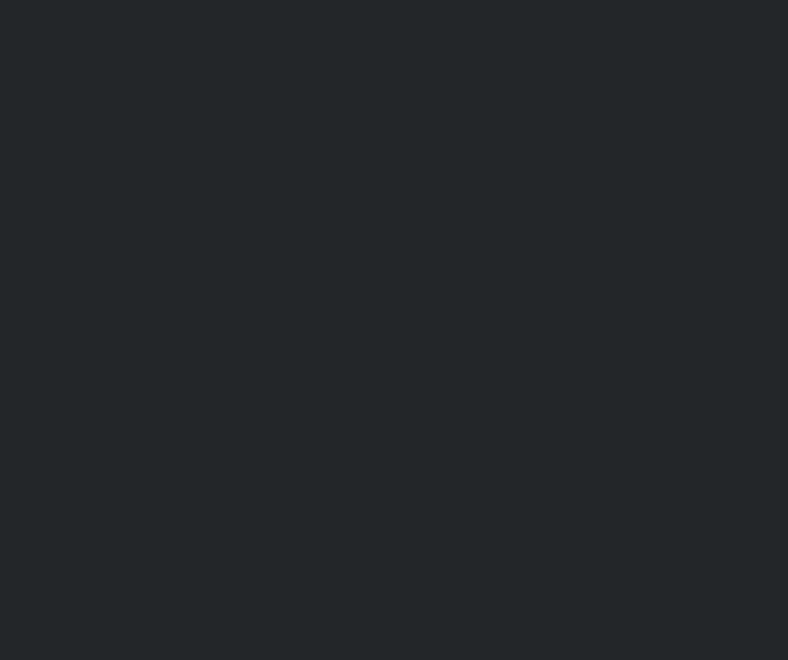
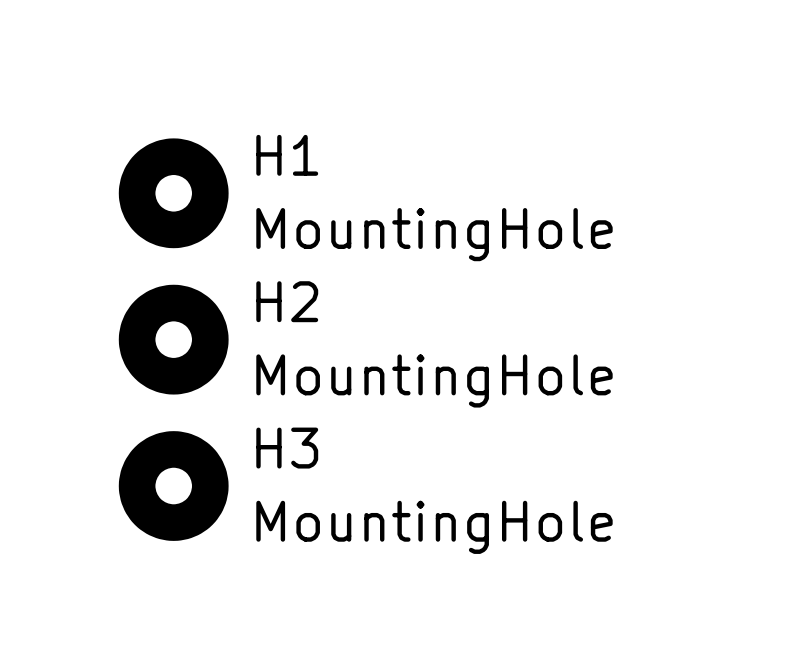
H1: none -> MountingHole (173, 193)
H2: none -> MountingHole (173, 339)
H3: none -> MountingHole (173, 486)

